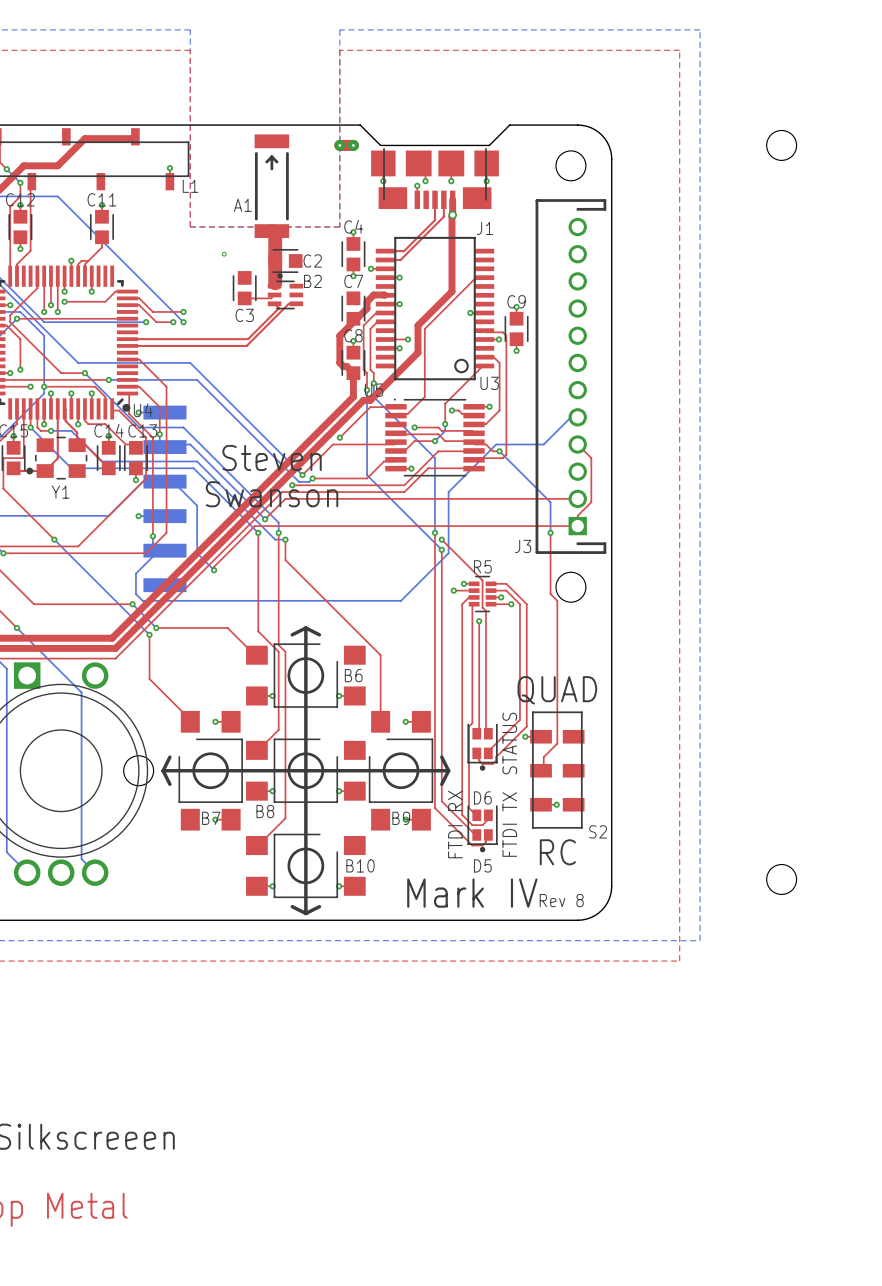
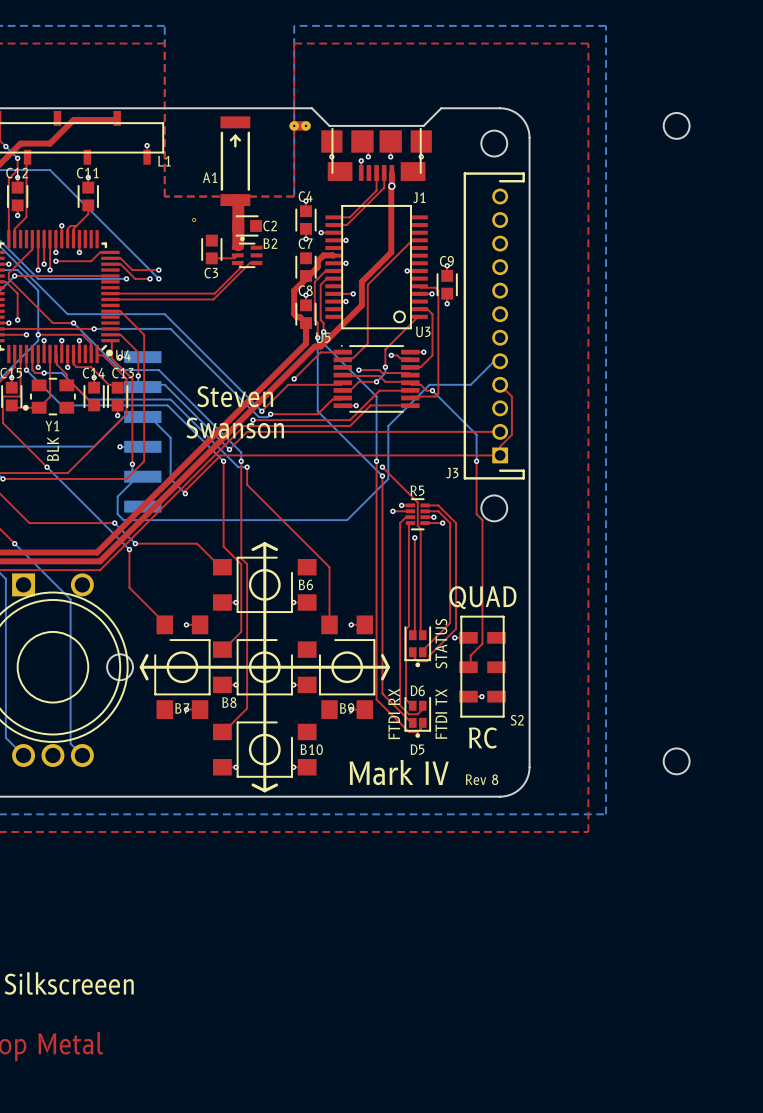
text: none -> BLK (52, 449)

